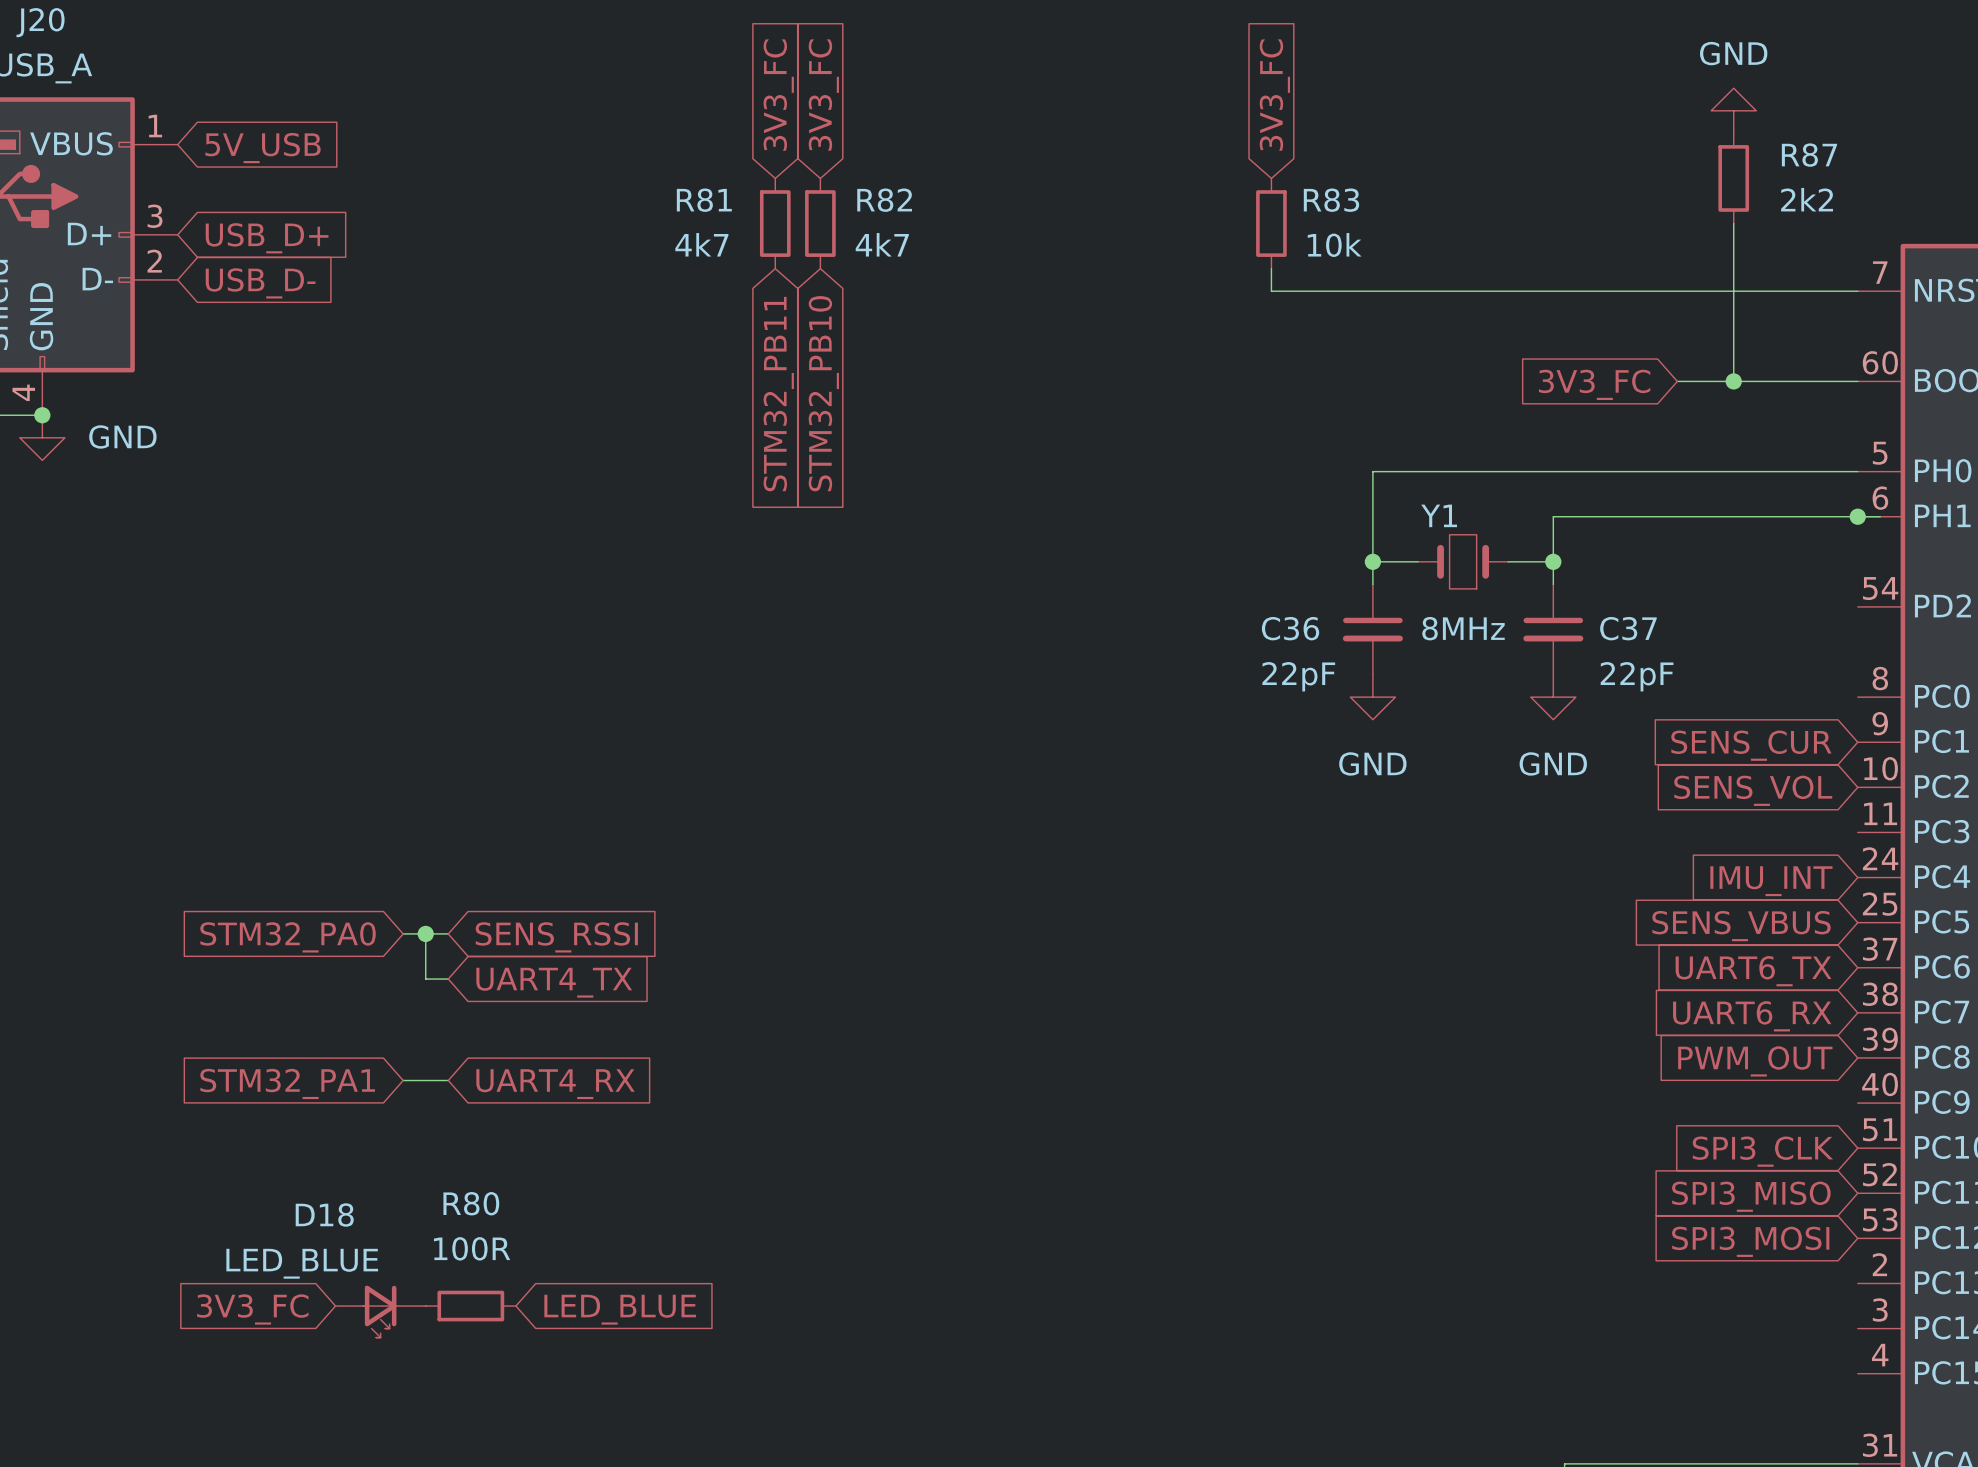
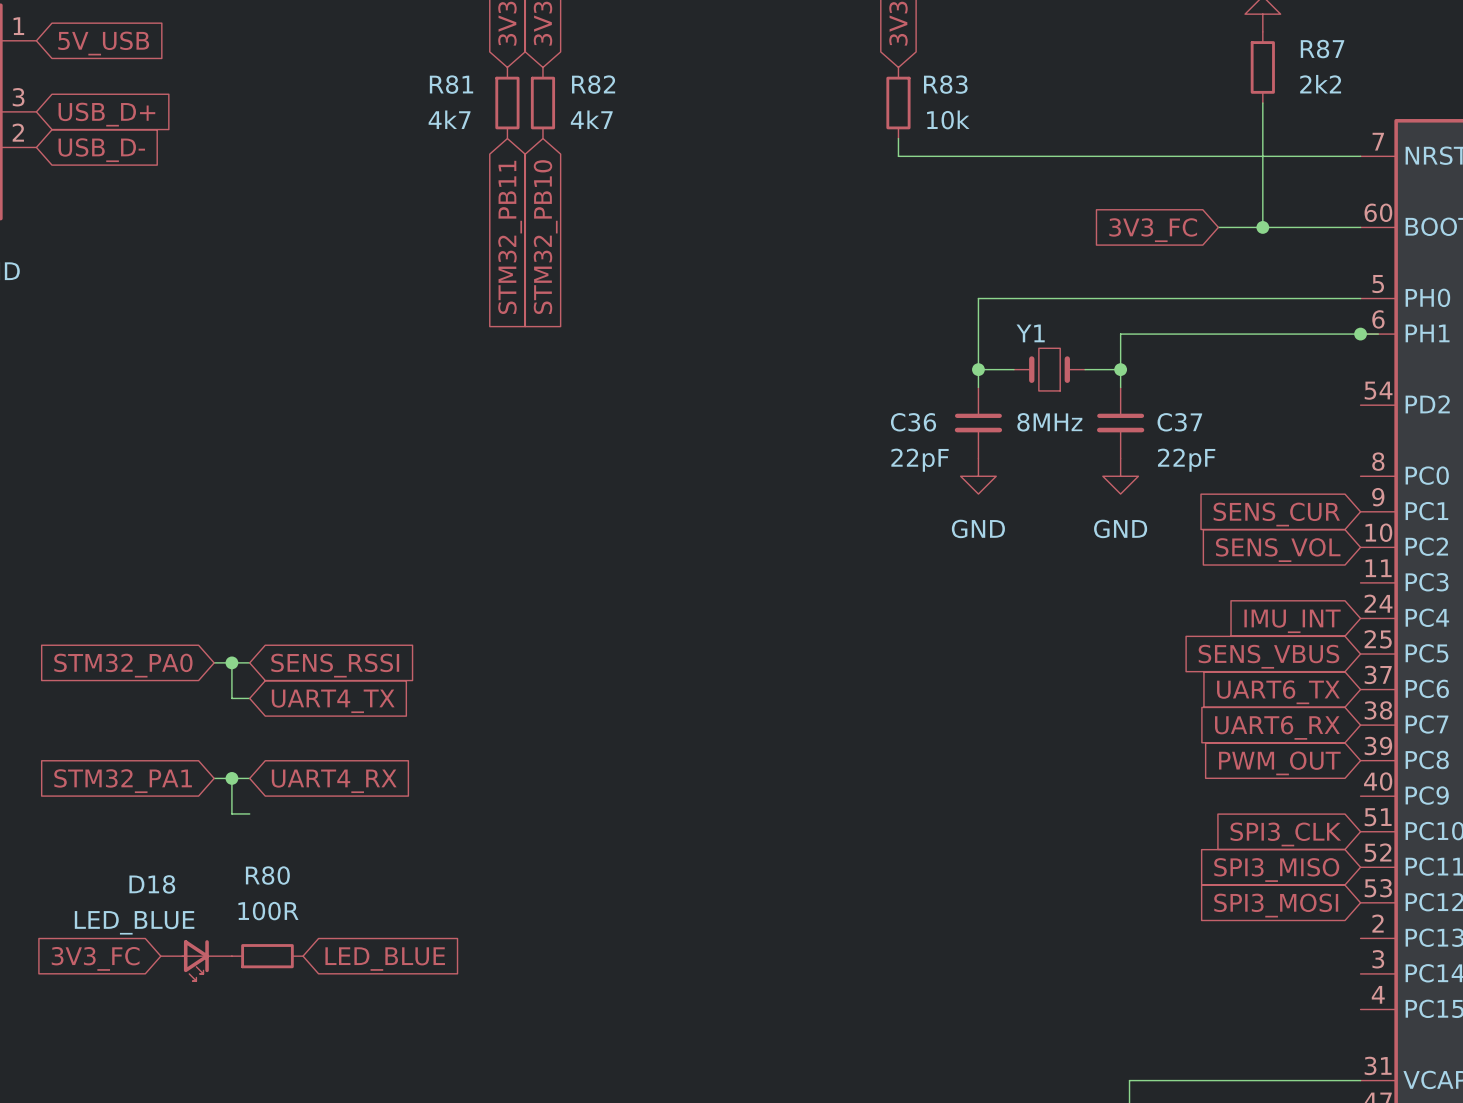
wire: none -> (231, 778) (231, 813) (249, 813)
junction: none -> (231, 778)

